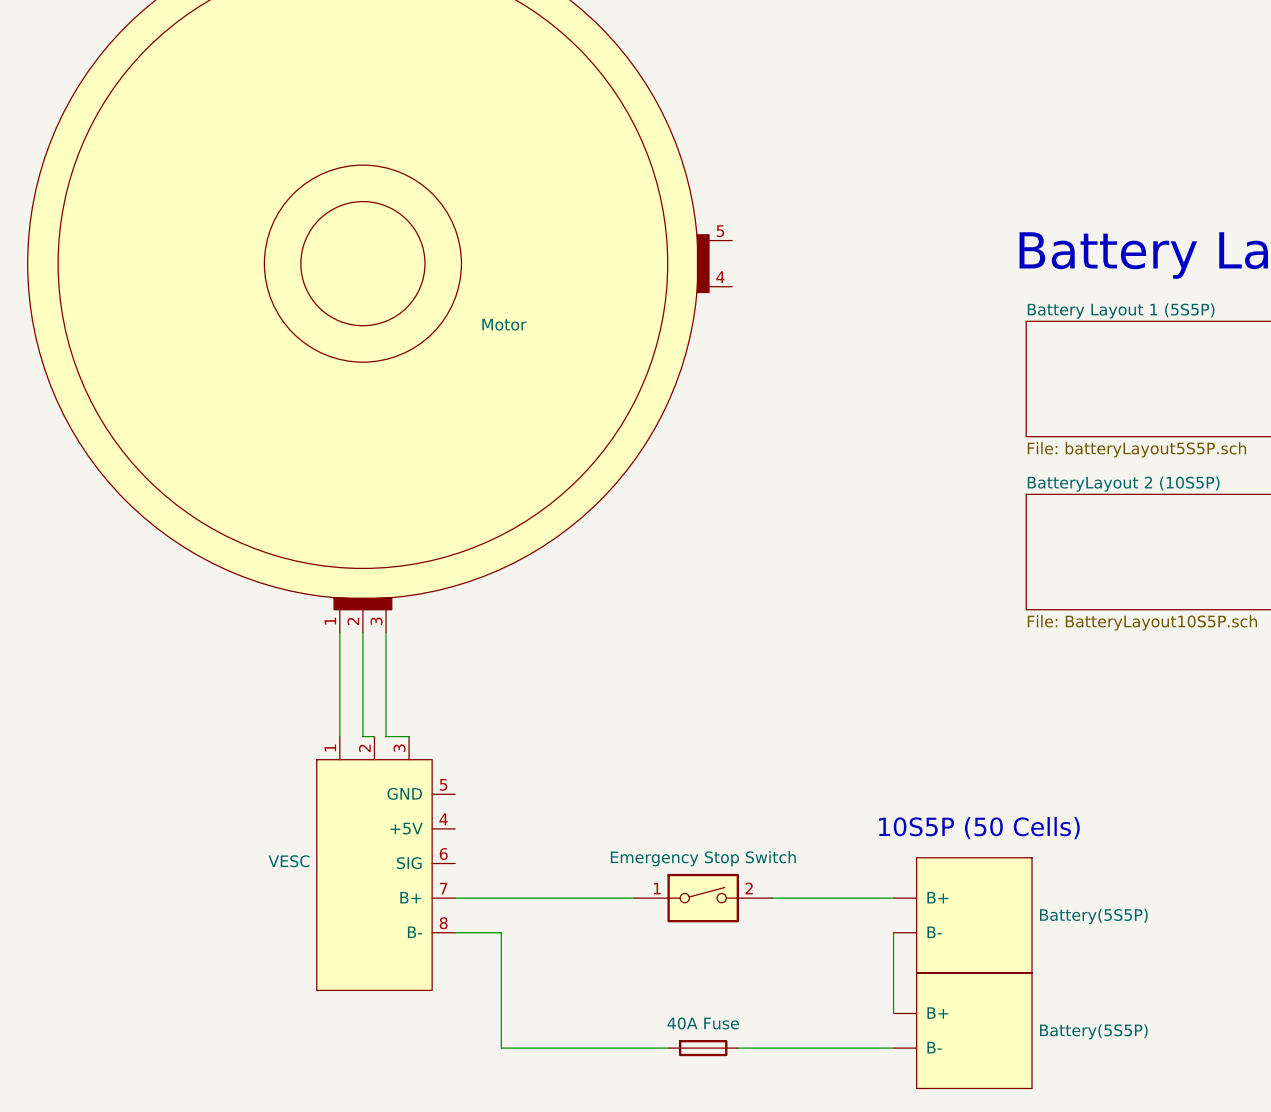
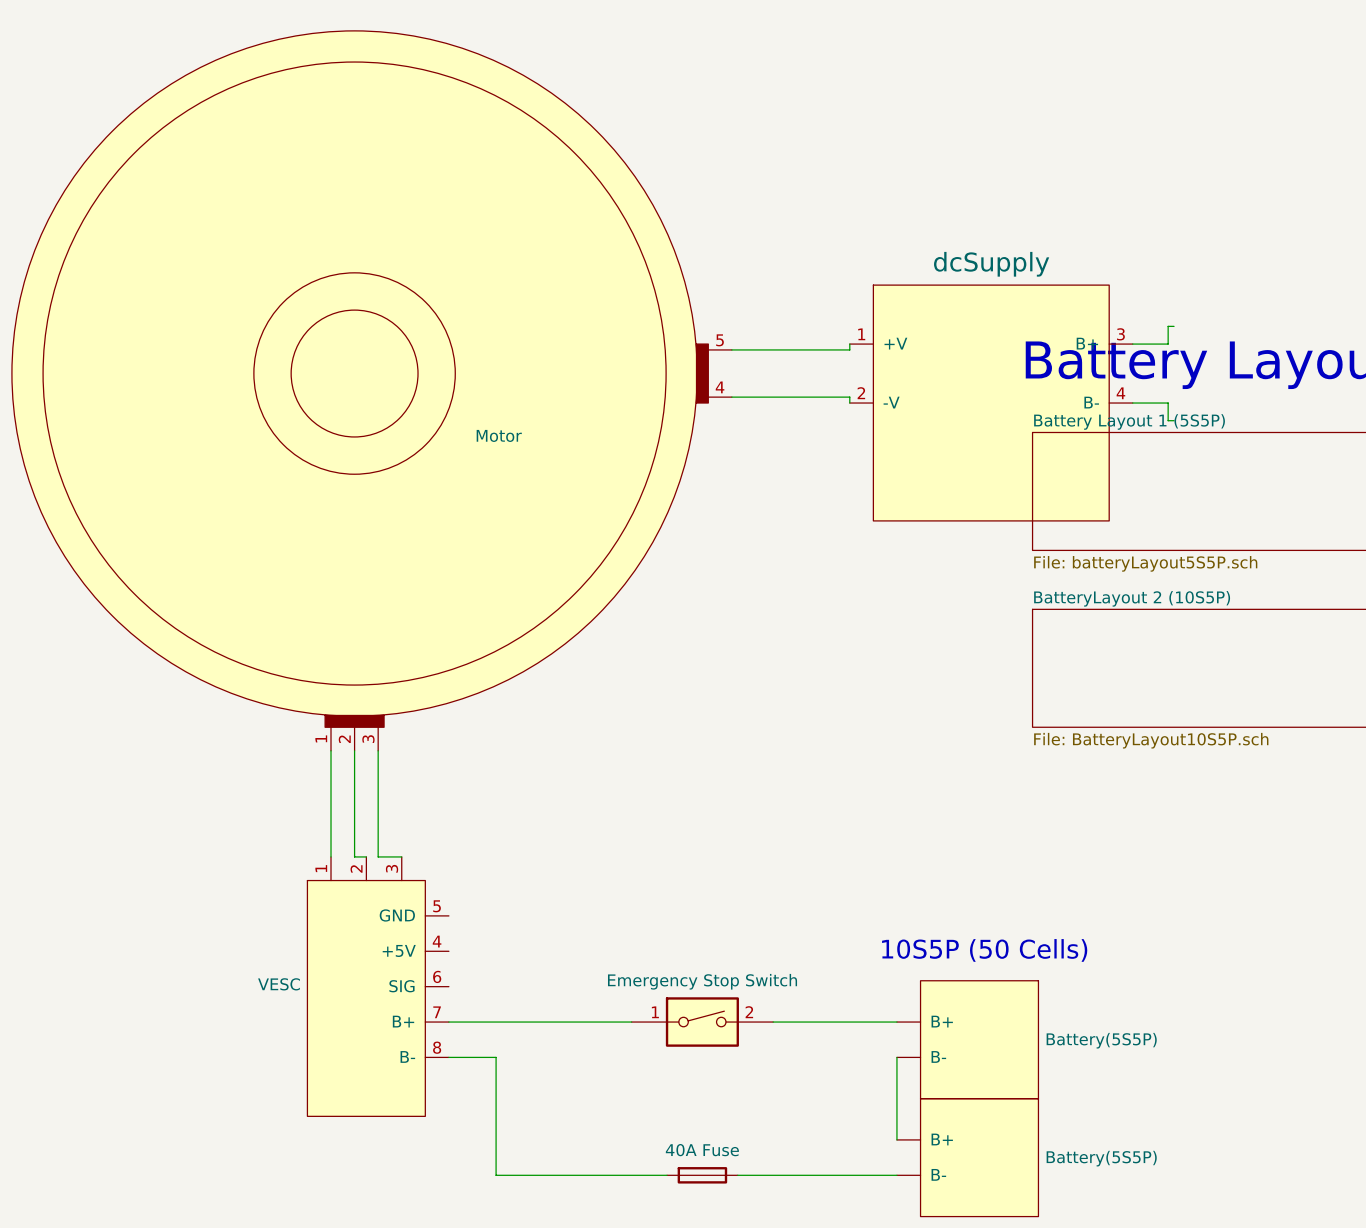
wire: none -> (1174, 326) (1168, 326) (1168, 344) (1132, 344)
wire: none -> (849, 344) (849, 349) (731, 349)
wire: none -> (731, 397) (849, 397) (849, 403)
part: none -> dcSupply (991, 403)
wire: none -> (1132, 403) (1168, 403) (1168, 420) (1174, 420)

